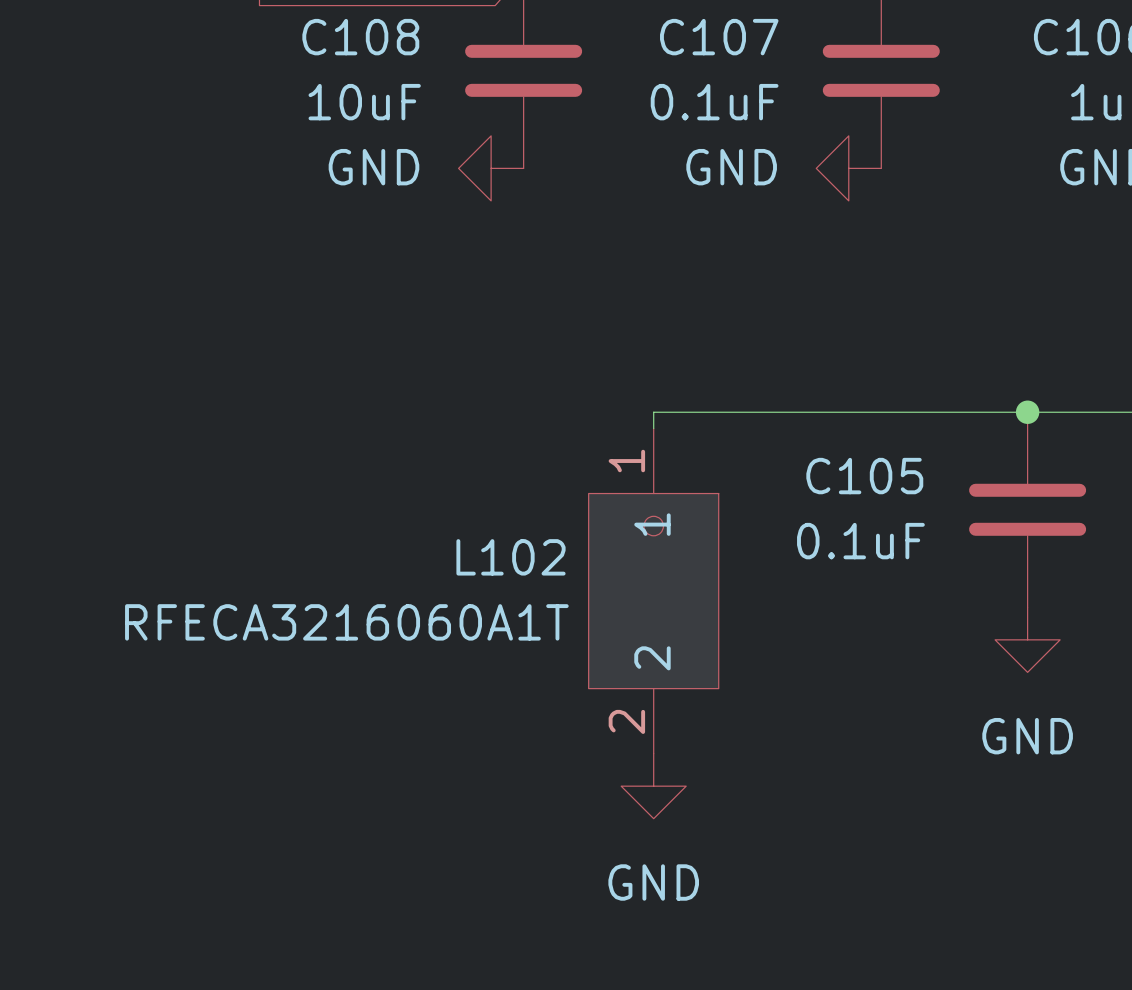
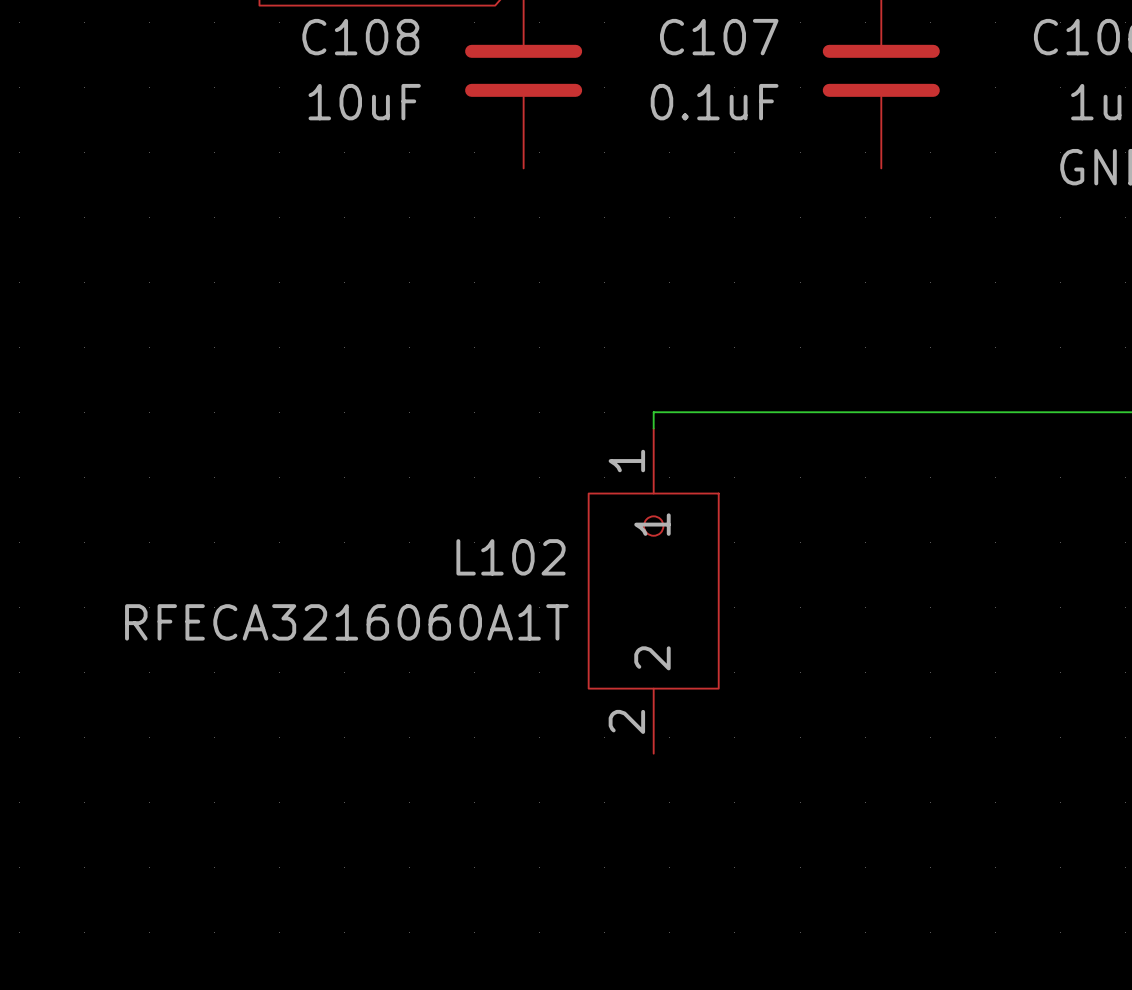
power symbol: GND (491, 168) -> none
power symbol: GND (848, 168) -> none
junction: (1027, 412) -> none
C105: 0.1uF (1027, 509) -> none
power symbol: GND (1027, 639) -> none
power symbol: GND (653, 786) -> none

